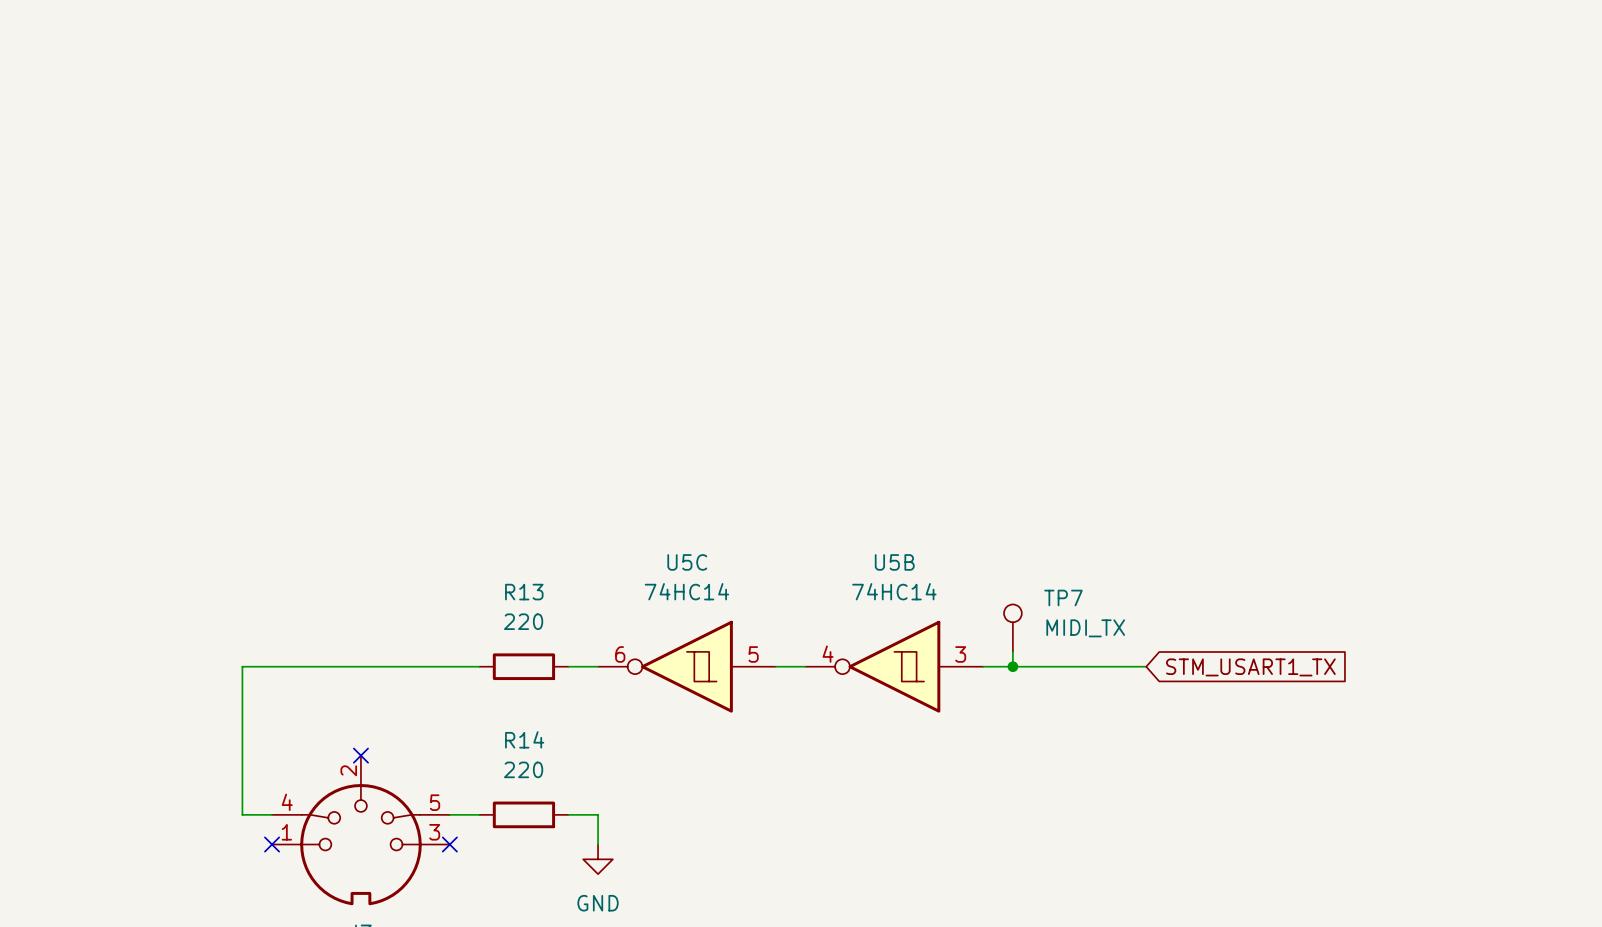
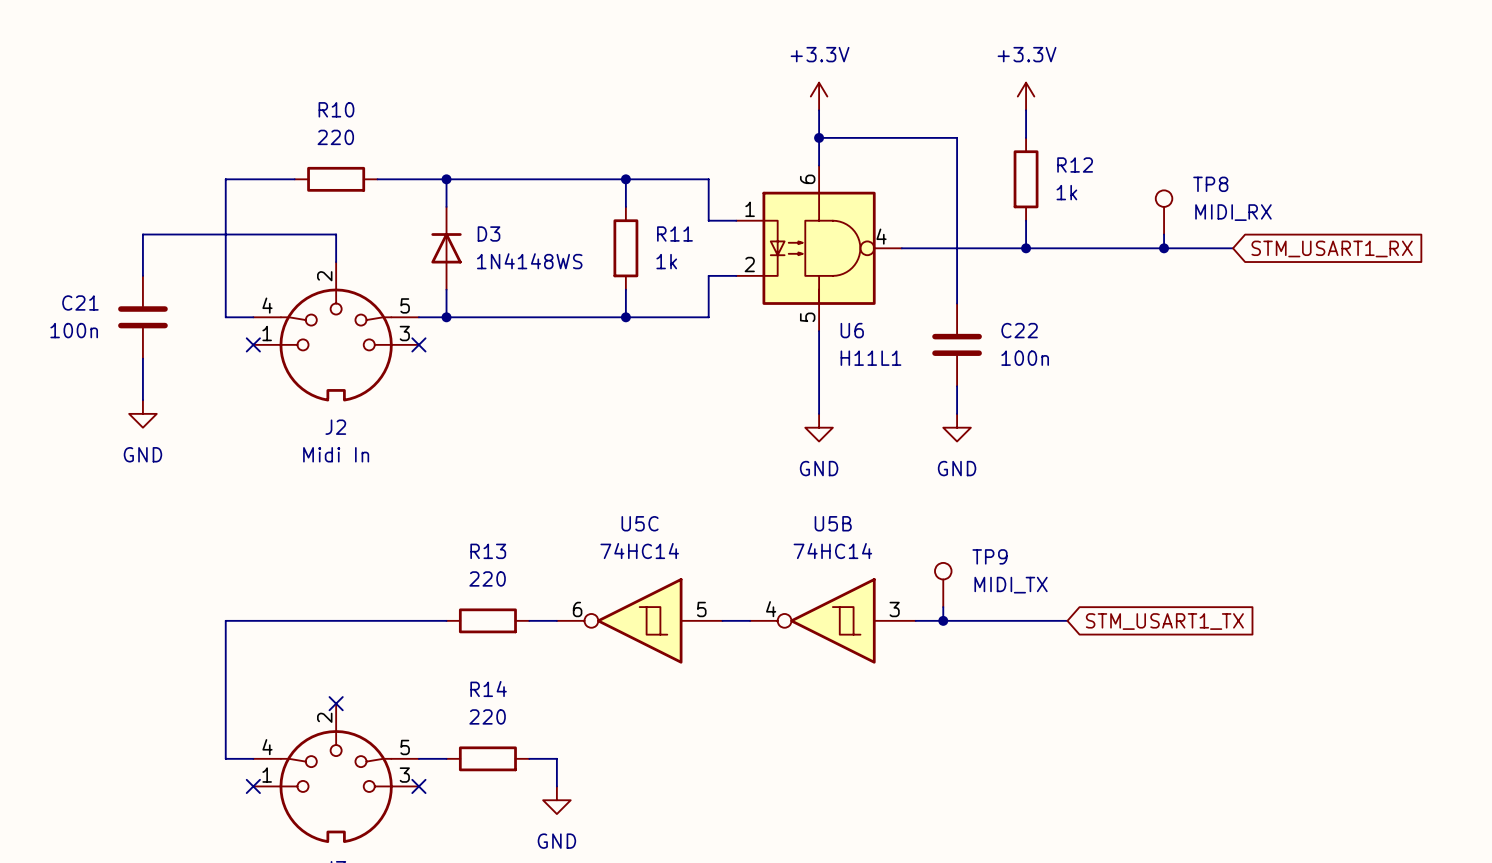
power symbol: none -> +3.3V (819, 96)
power symbol: none -> +3.3V (1026, 96)
wire: none -> (819, 110) (819, 165)
wire: none -> (1026, 110) (1026, 137)
wire: none -> (819, 137) (957, 137) (957, 303)
junction: none -> (819, 137)
wire: none -> (294, 179) (225, 179) (225, 317) (253, 317)
R10: none -> 220 (336, 179)
wire: none -> (377, 179) (708, 179) (708, 220) (736, 220)
wire: none -> (446, 179) (446, 206)
junction: none -> (446, 179)
wire: none -> (625, 179) (625, 206)
junction: none -> (625, 179)
R12: none -> 1k (1026, 179)
TP8: none -> MIDI_RX (1164, 212)
wire: none -> (1026, 220) (1026, 248)
wire: none -> (1164, 234) (1164, 248)
D3: none -> 1N4148WS (446, 248)
R11: none -> 1k (625, 248)
U6: none -> H11L1 (819, 248)
wire: none -> (901, 248) (1233, 248)
junction: none -> (1026, 248)
junction: none -> (1164, 248)
global label: none -> STM_USART1_RX (1332, 248)
wire: none -> (336, 262) (336, 234) (142, 234) (142, 275)
wire: none -> (736, 275) (708, 275) (708, 317) (418, 317)
wire: none -> (446, 289) (446, 317)
wire: none -> (625, 289) (625, 317)
C21: none -> 100n (142, 317)
junction: none -> (446, 317)
junction: none -> (625, 317)
wire: none -> (819, 331) (819, 413)
J2: none -> Midi In (336, 331)
no-connect mark: none -> (253, 344)
no-connect mark: none -> (418, 344)
C22: none -> 100n (957, 344)
wire: none -> (142, 358) (142, 400)
wire: none -> (957, 386) (957, 413)
power symbol: none -> GND (142, 413)
power symbol: none -> GND (819, 427)
power symbol: none -> GND (957, 427)
TP7 name: TP7 (1063, 597) -> TP9 (990, 556)

